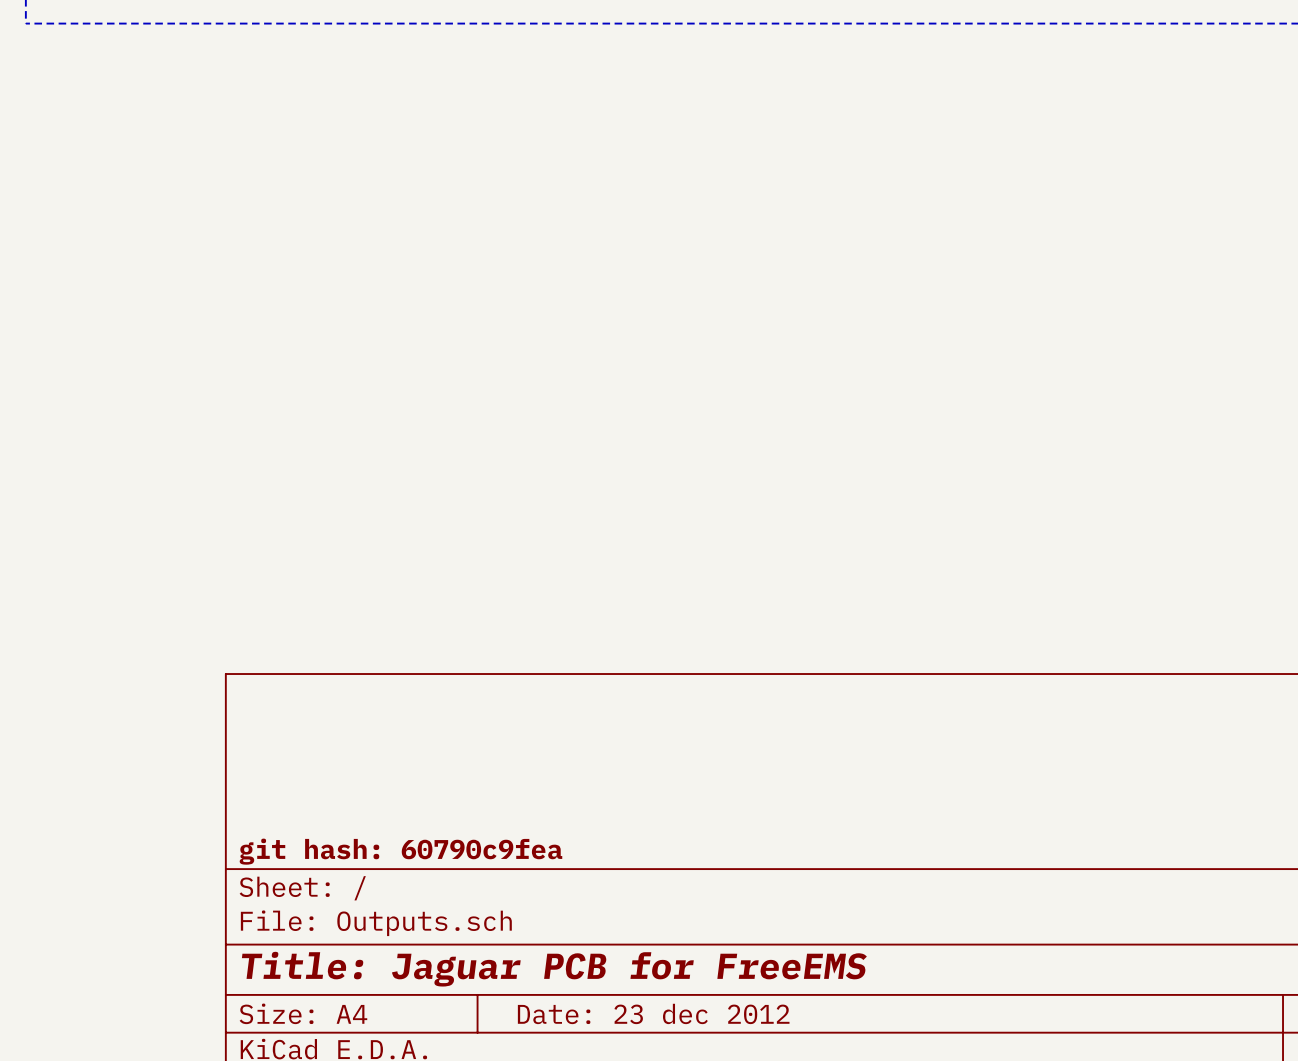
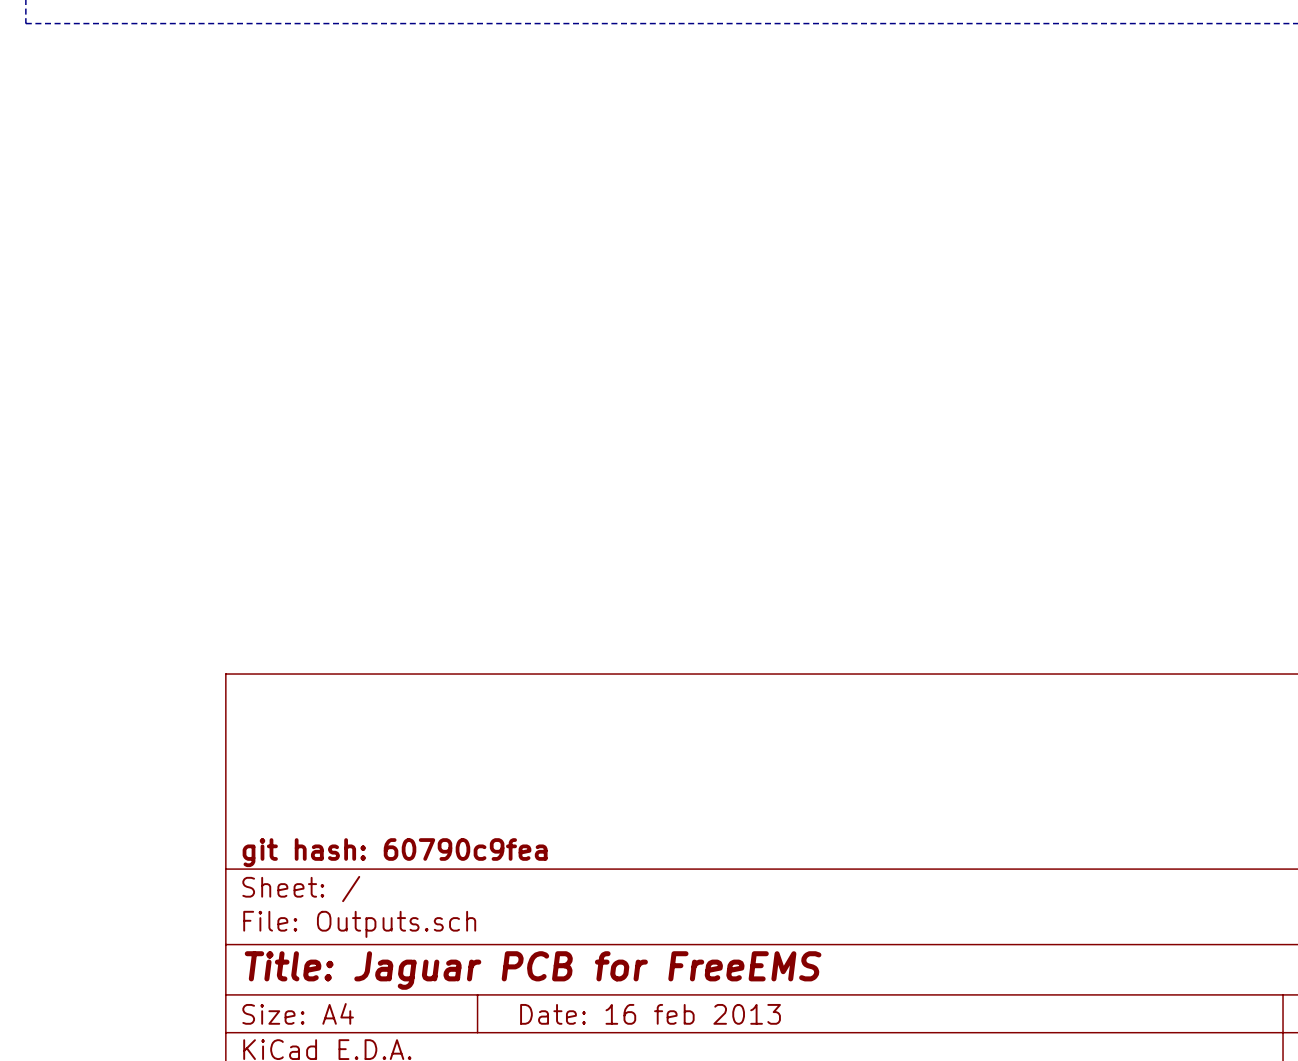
title block: Date: 23 dec 2012 (653, 1013) -> Date: 16 feb 2013 (650, 1014)

